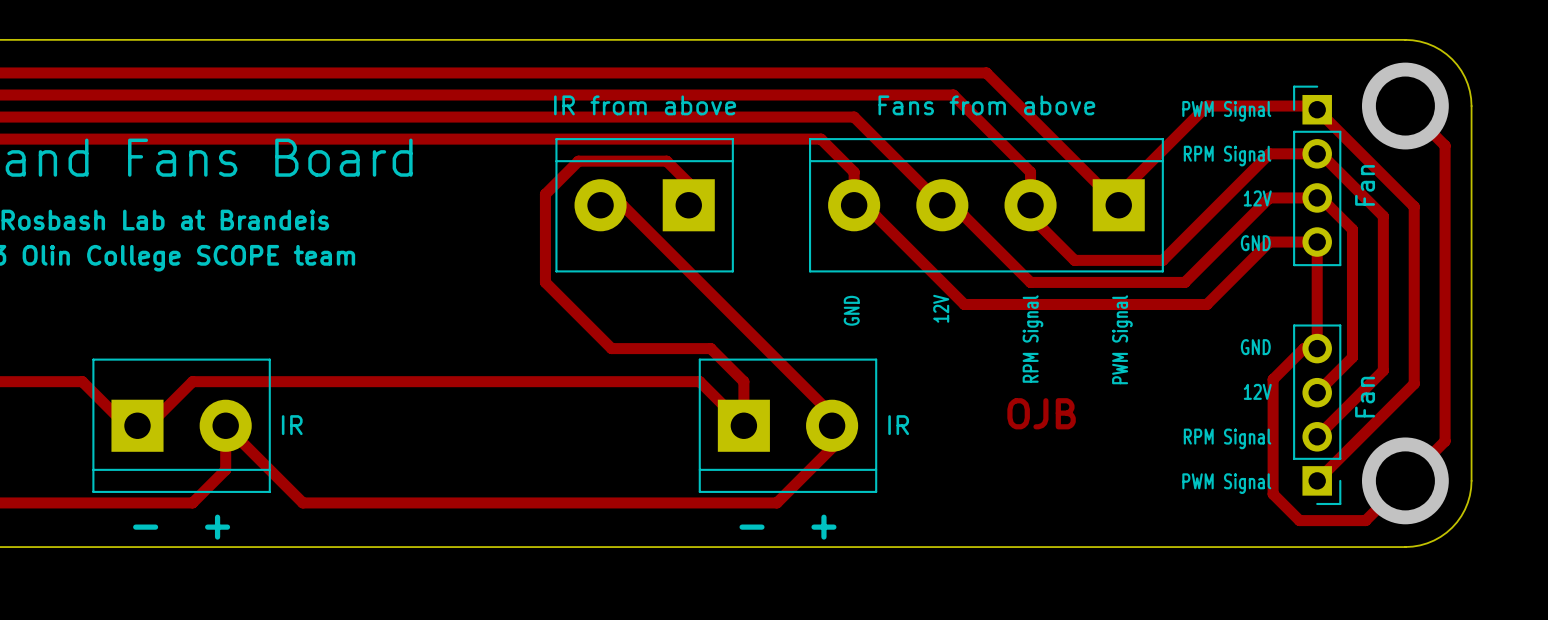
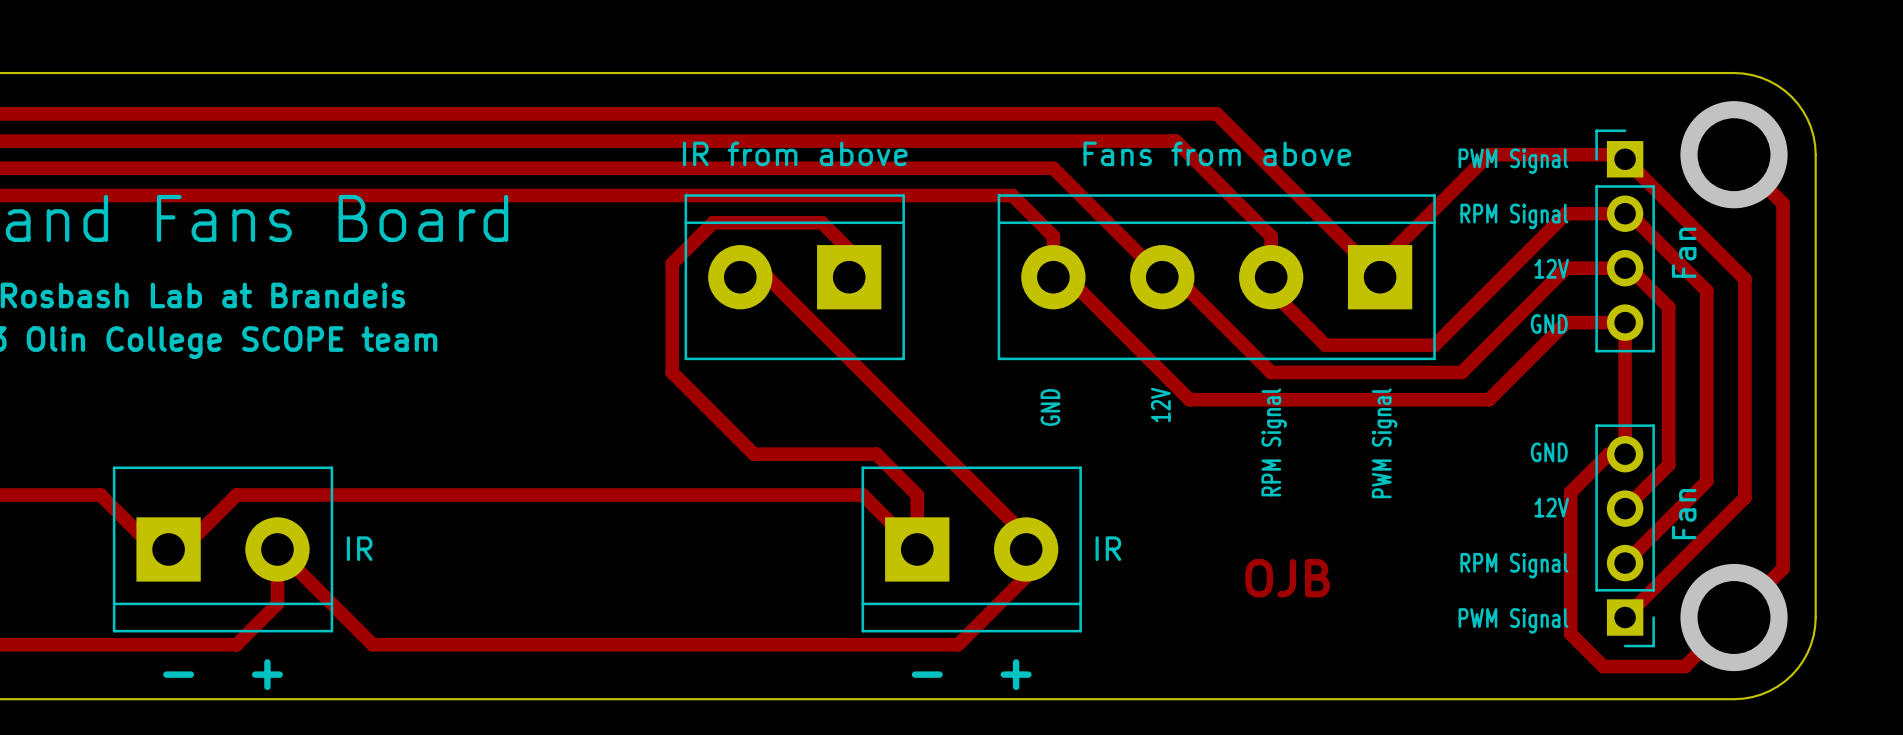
text position: OJB (1041, 413) -> OJB (1287, 578)

